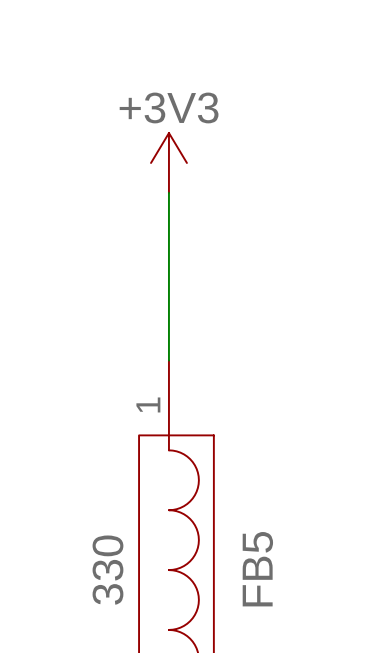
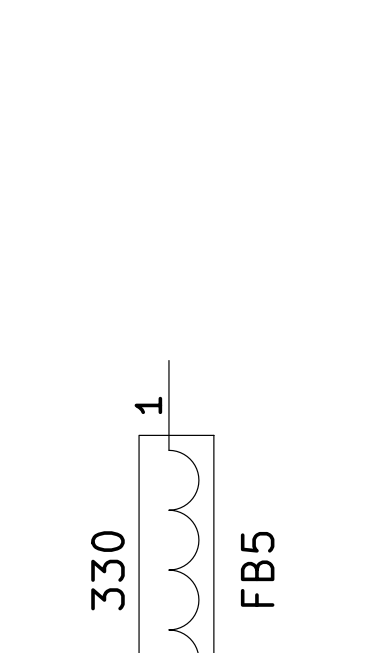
power symbol: +3V3 (168, 162) -> none
wire: (168, 192) (168, 360) -> none

